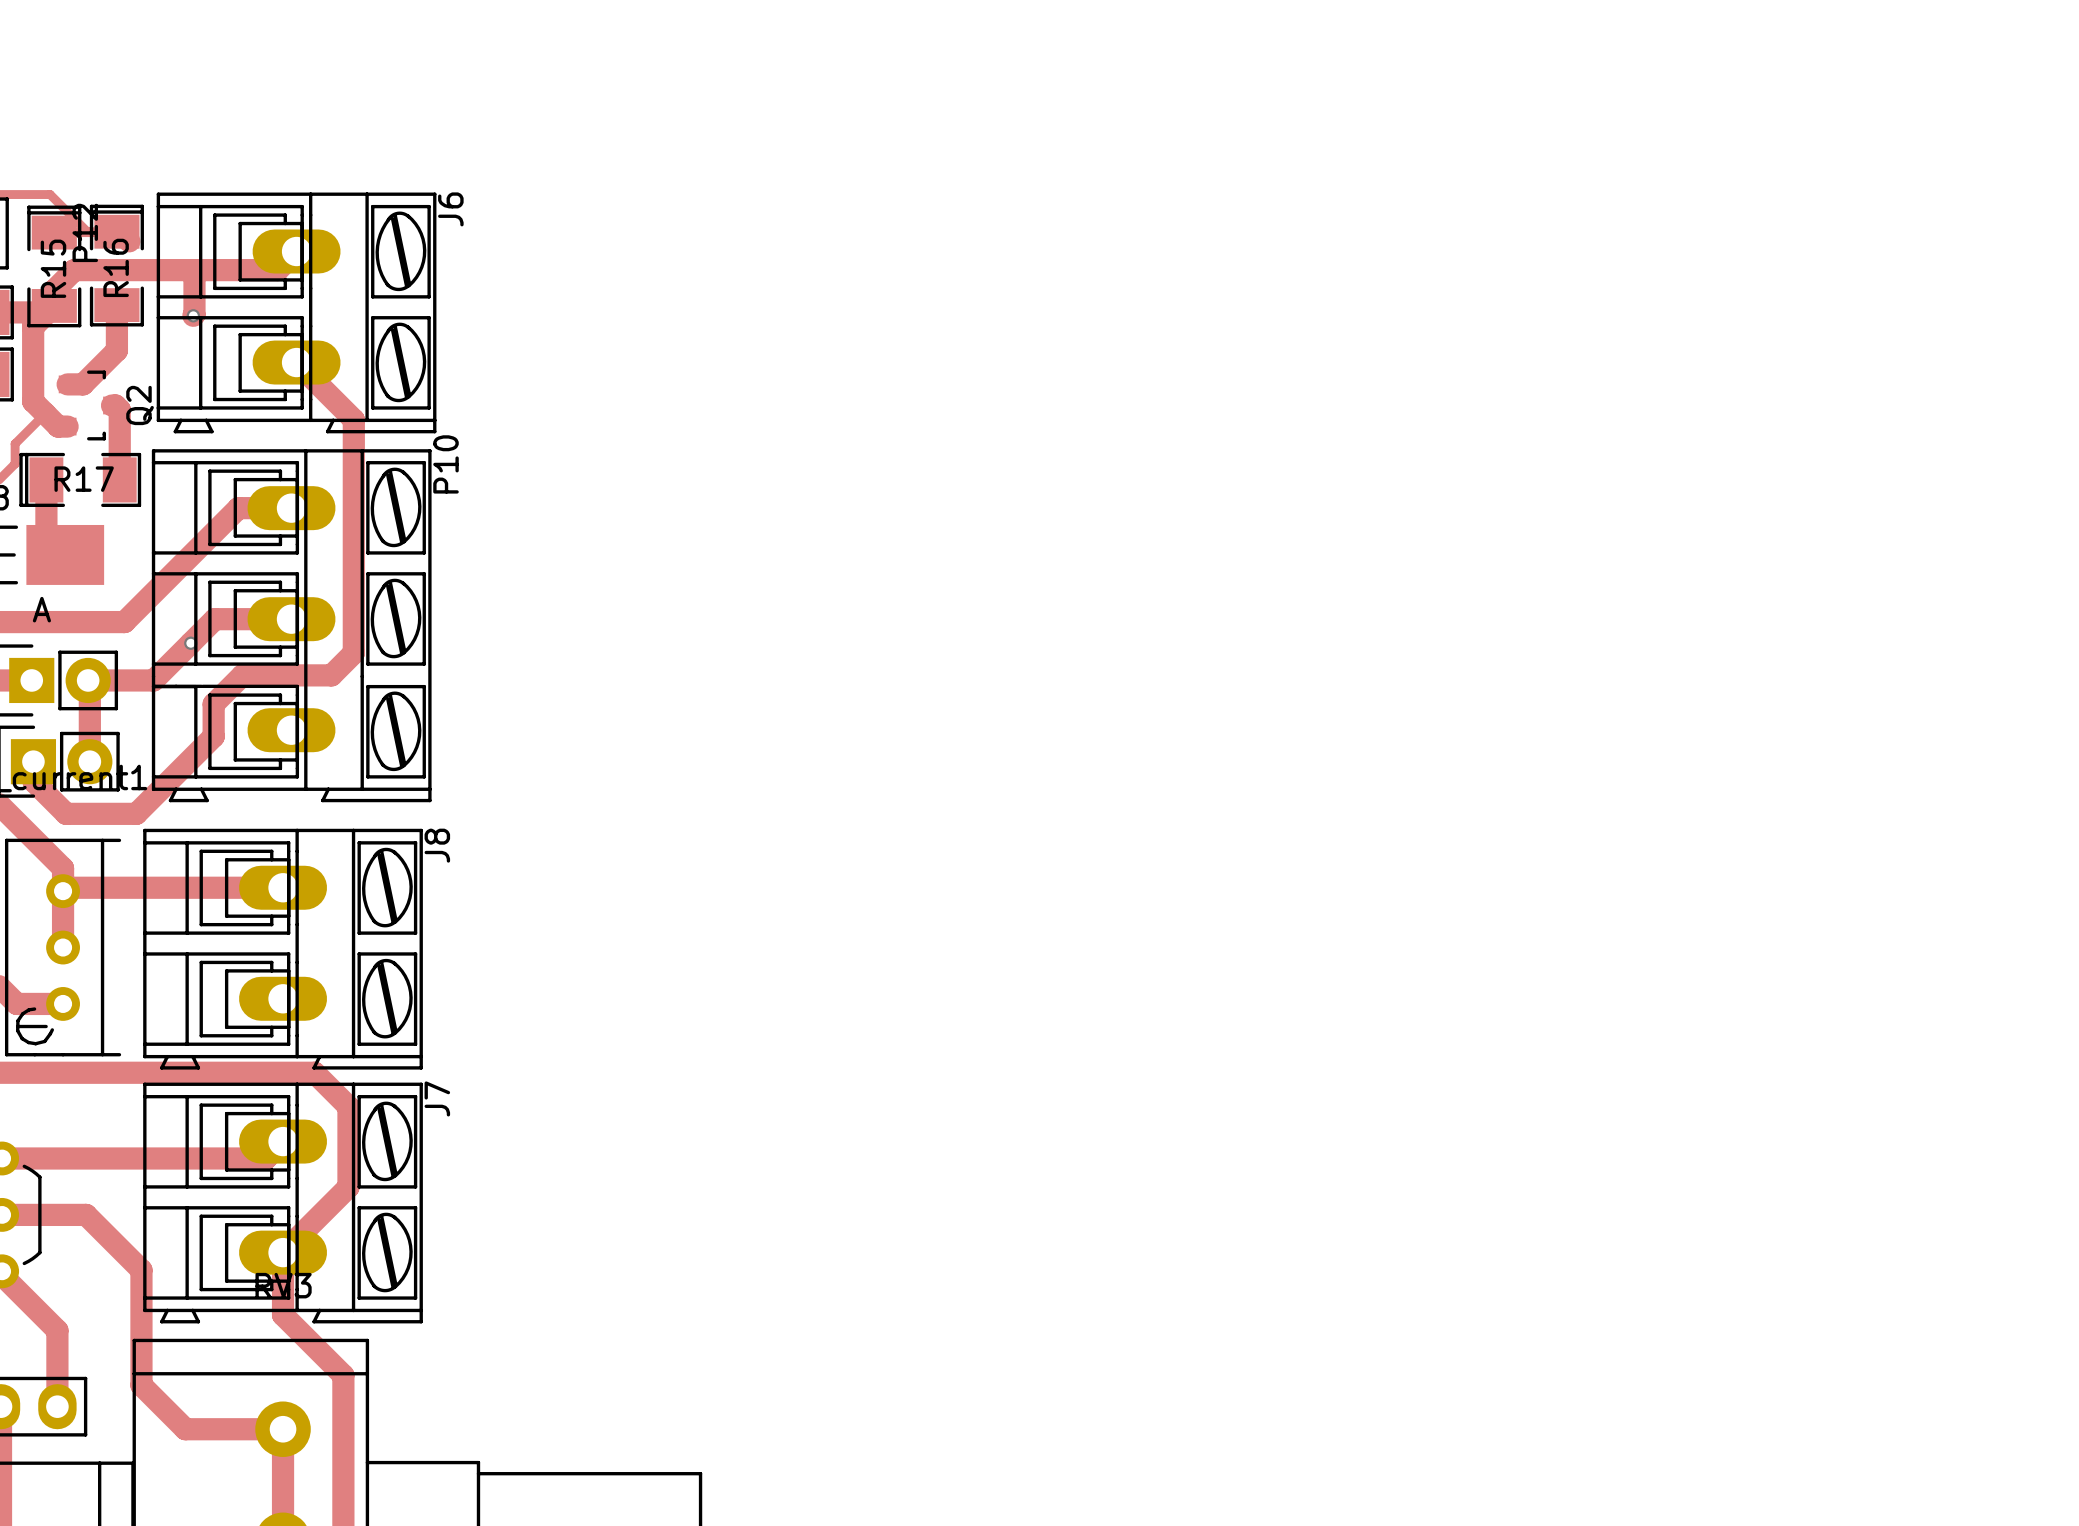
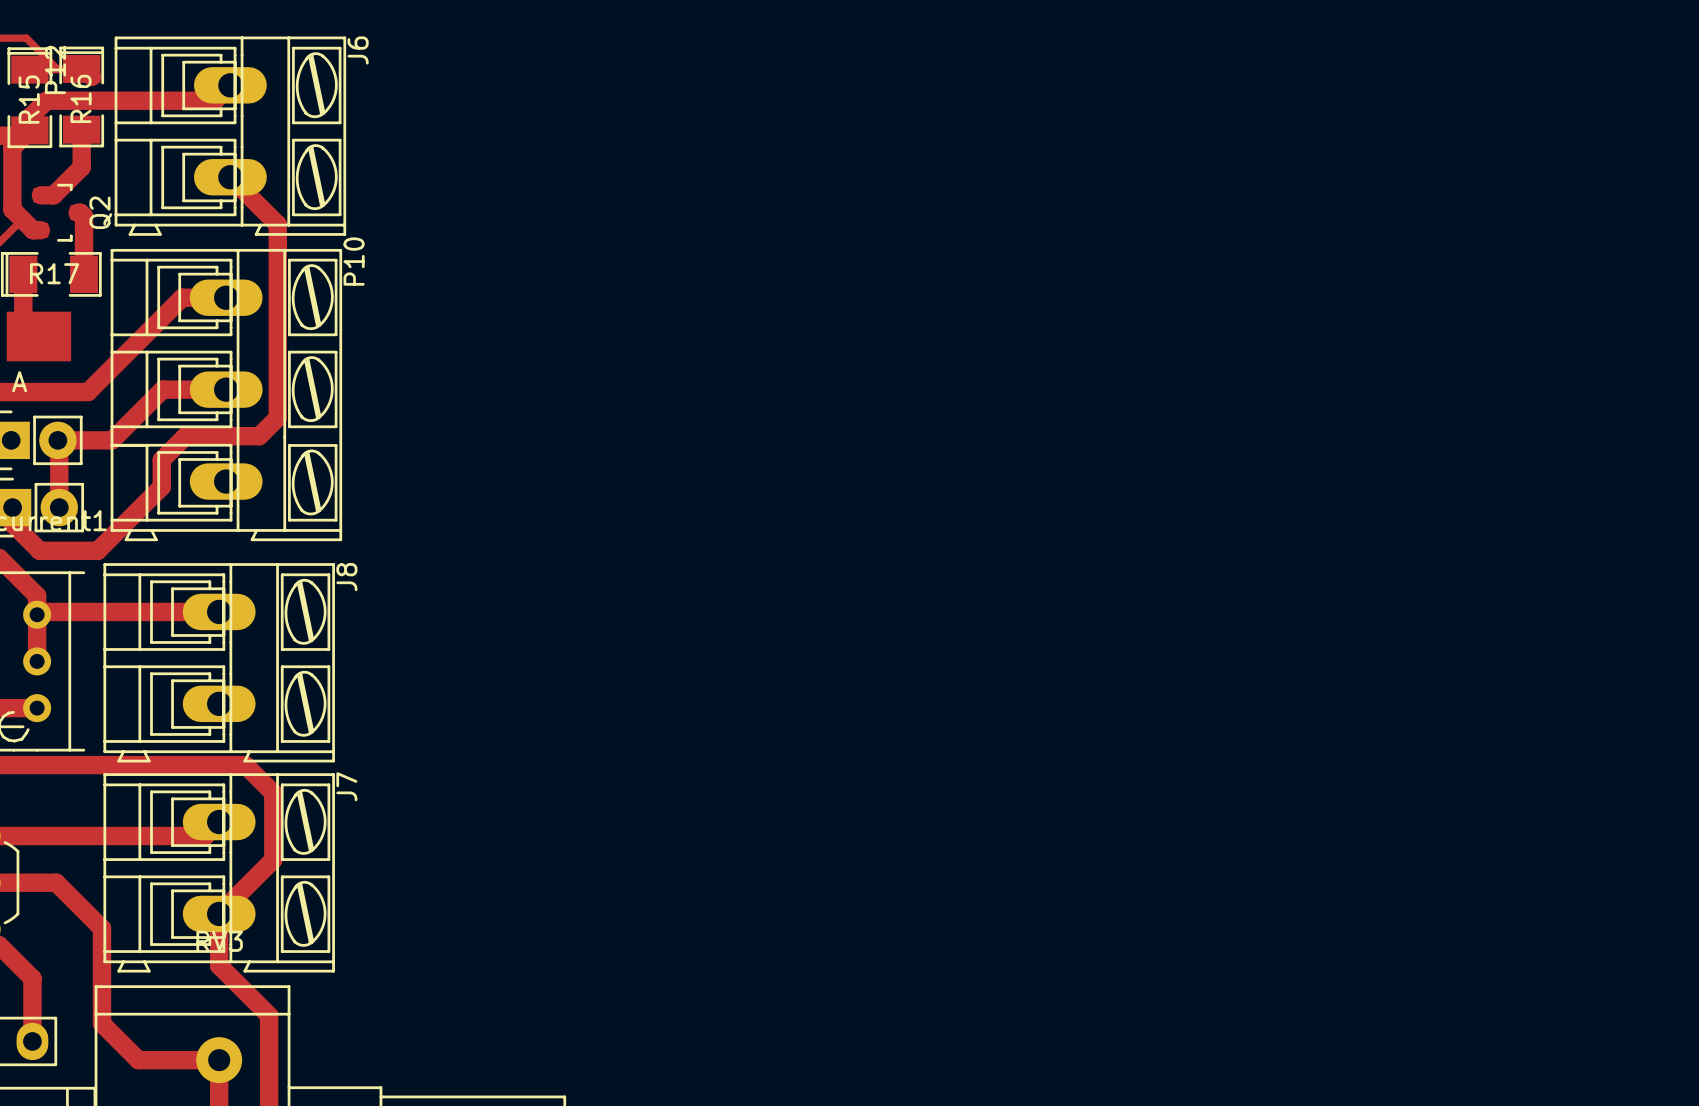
track: (194, 270) (193, 315) -> none
via: (193, 315) -> none
via: (190, 643) -> none

